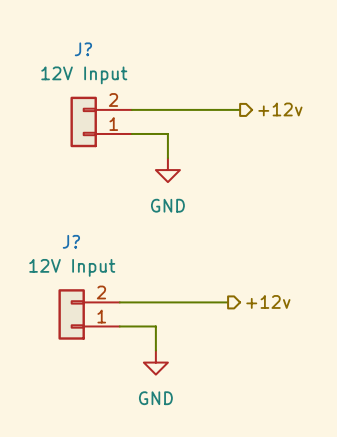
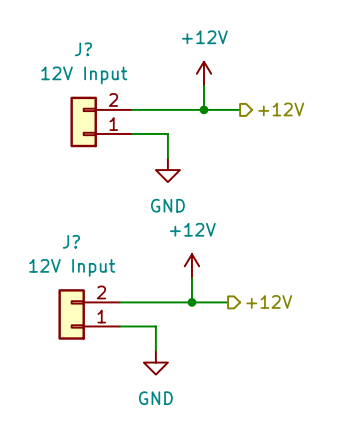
power symbol: none -> +12V (204, 73)
wire: none -> (204, 85) (204, 109)
junction: none -> (204, 109)
hierarchical label: +12v (280, 109) -> +12V (281, 109)
power symbol: none -> +12V (191, 266)
wire: none -> (191, 278) (191, 302)
hierarchical label: +12v (268, 301) -> +12V (269, 301)
junction: none -> (191, 302)

